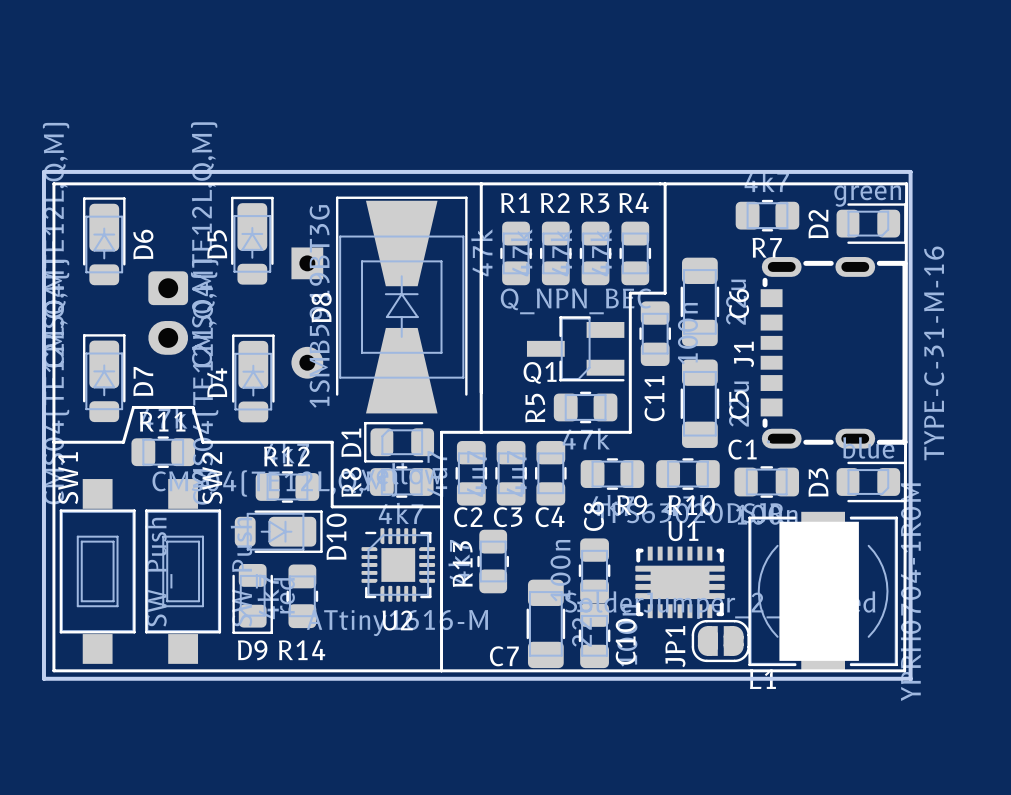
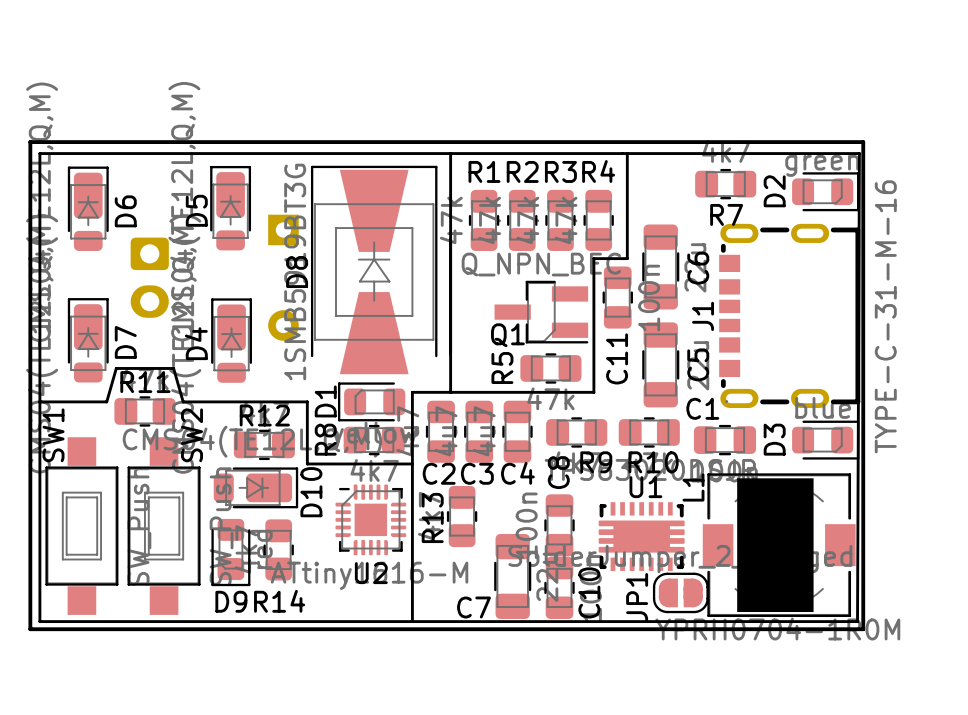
L1 rotation: 0° (823, 591) -> 90° clockwise (779, 545)

